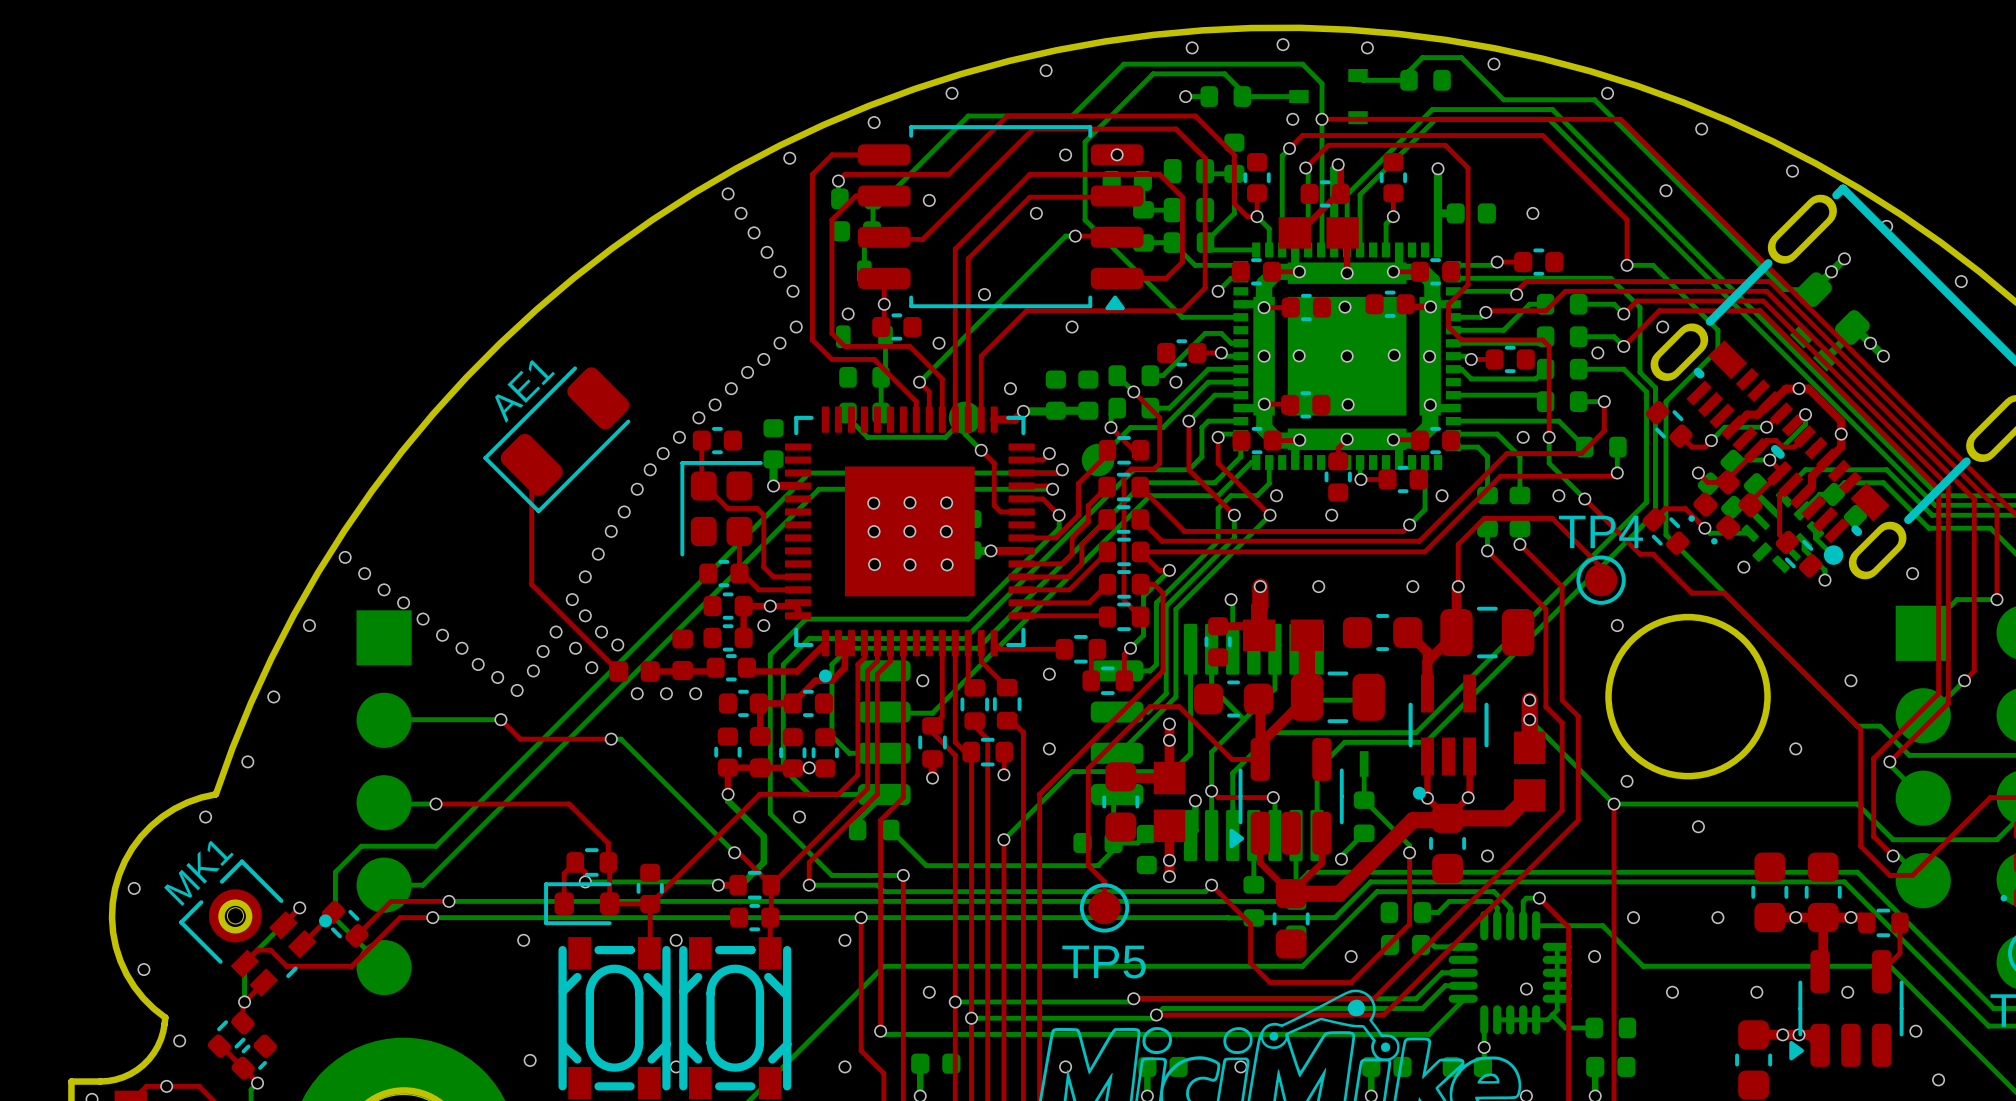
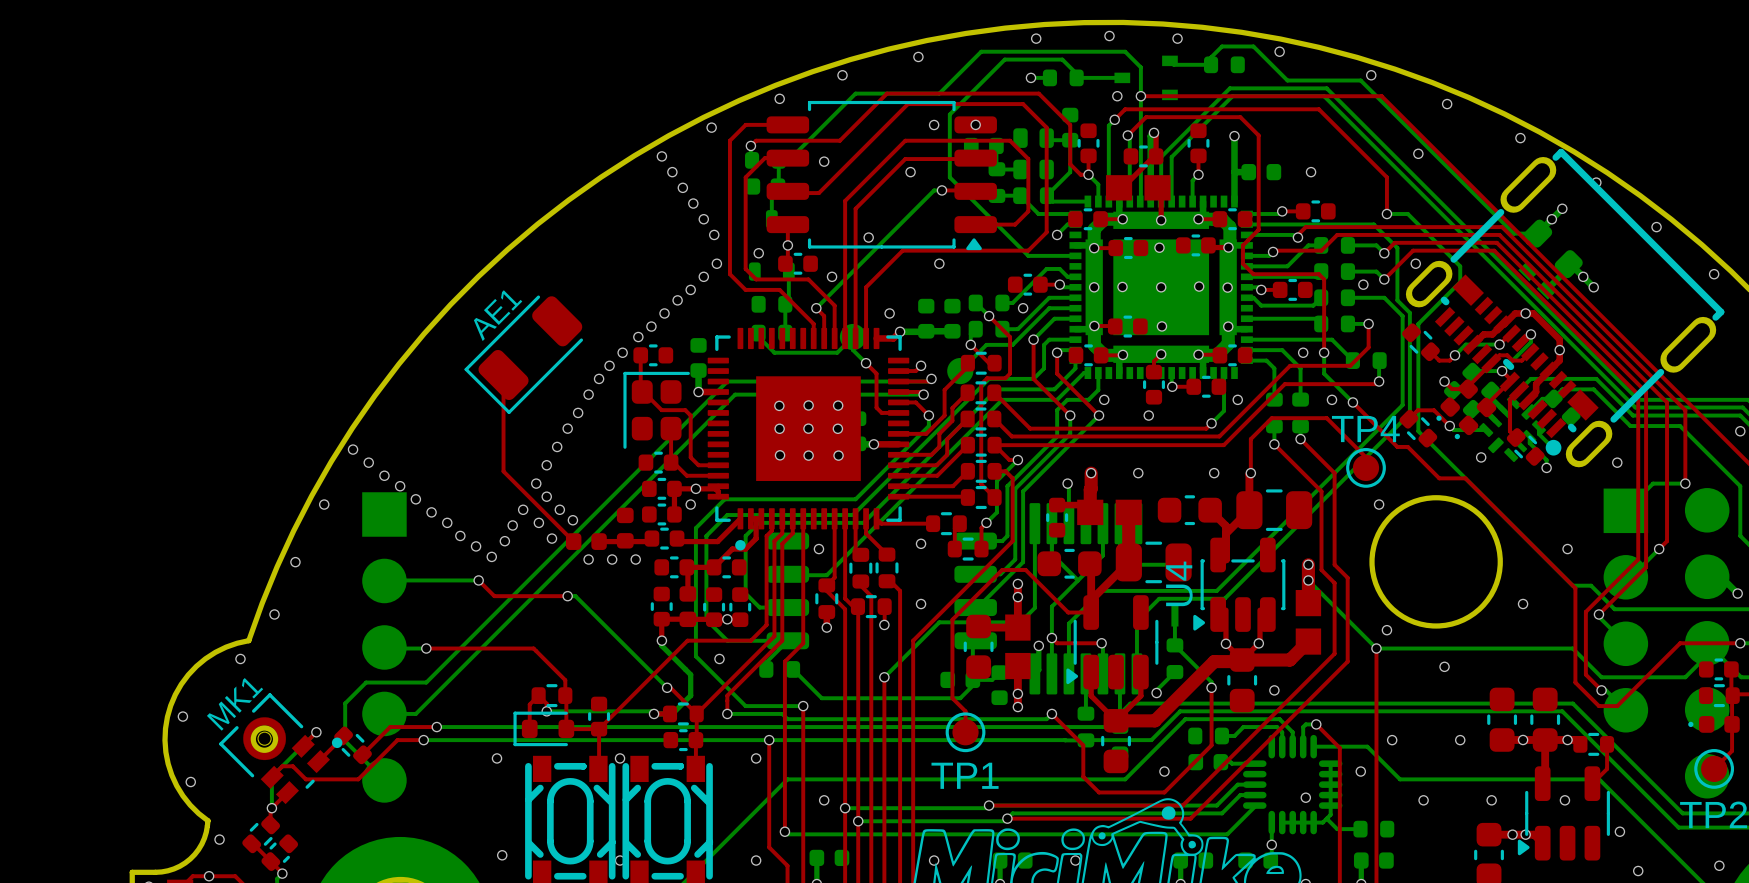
U4: none -> (1239, 584)
part: (1448, 737) -> none
TP5 name: TP5 (1104, 962) -> TP1 (965, 775)

